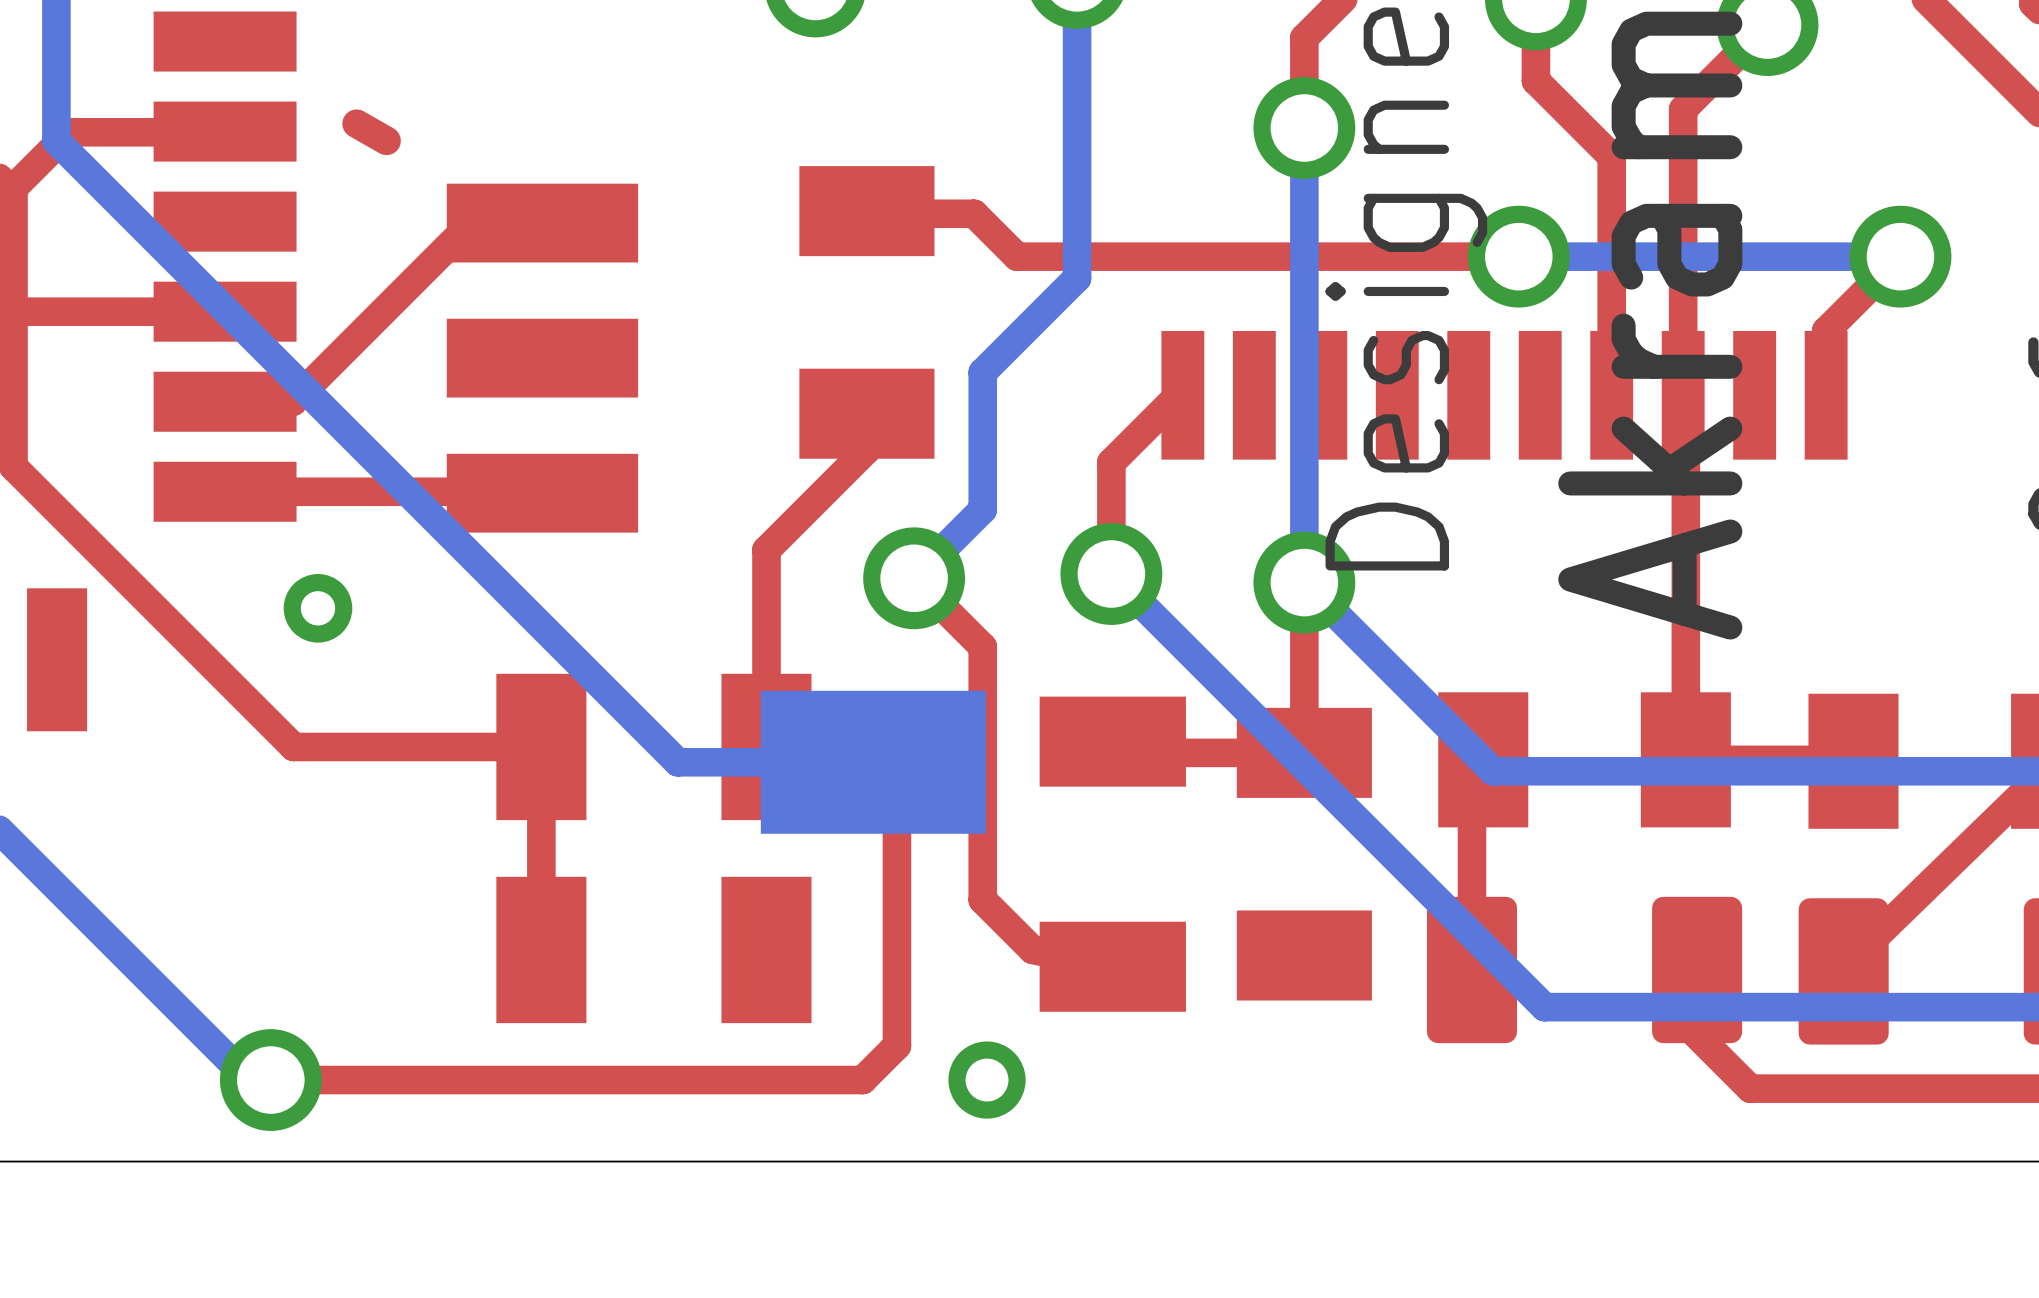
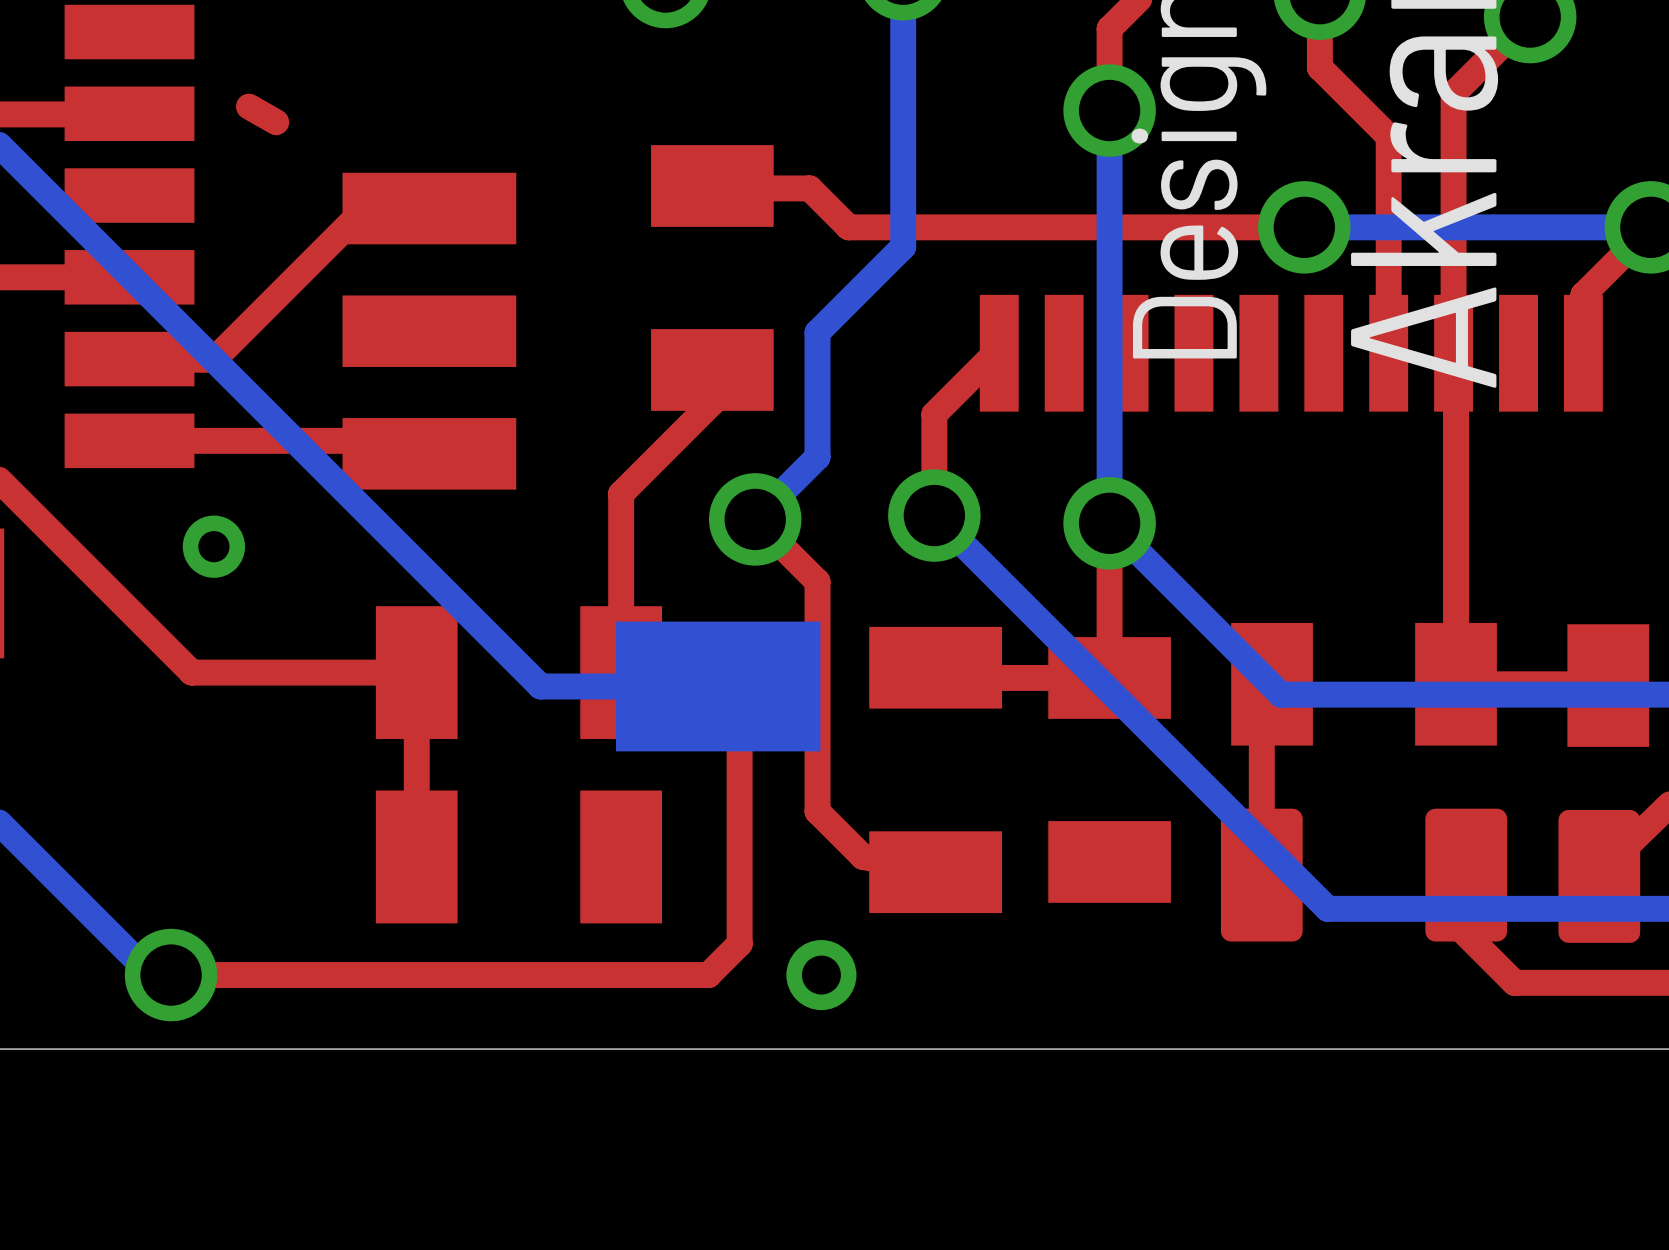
top track: (541, 222) (472, 222) (293, 401) -> (429, 208) (365, 208) (213, 359) (191, 359)
part position: (542, 358) -> (429, 331)

